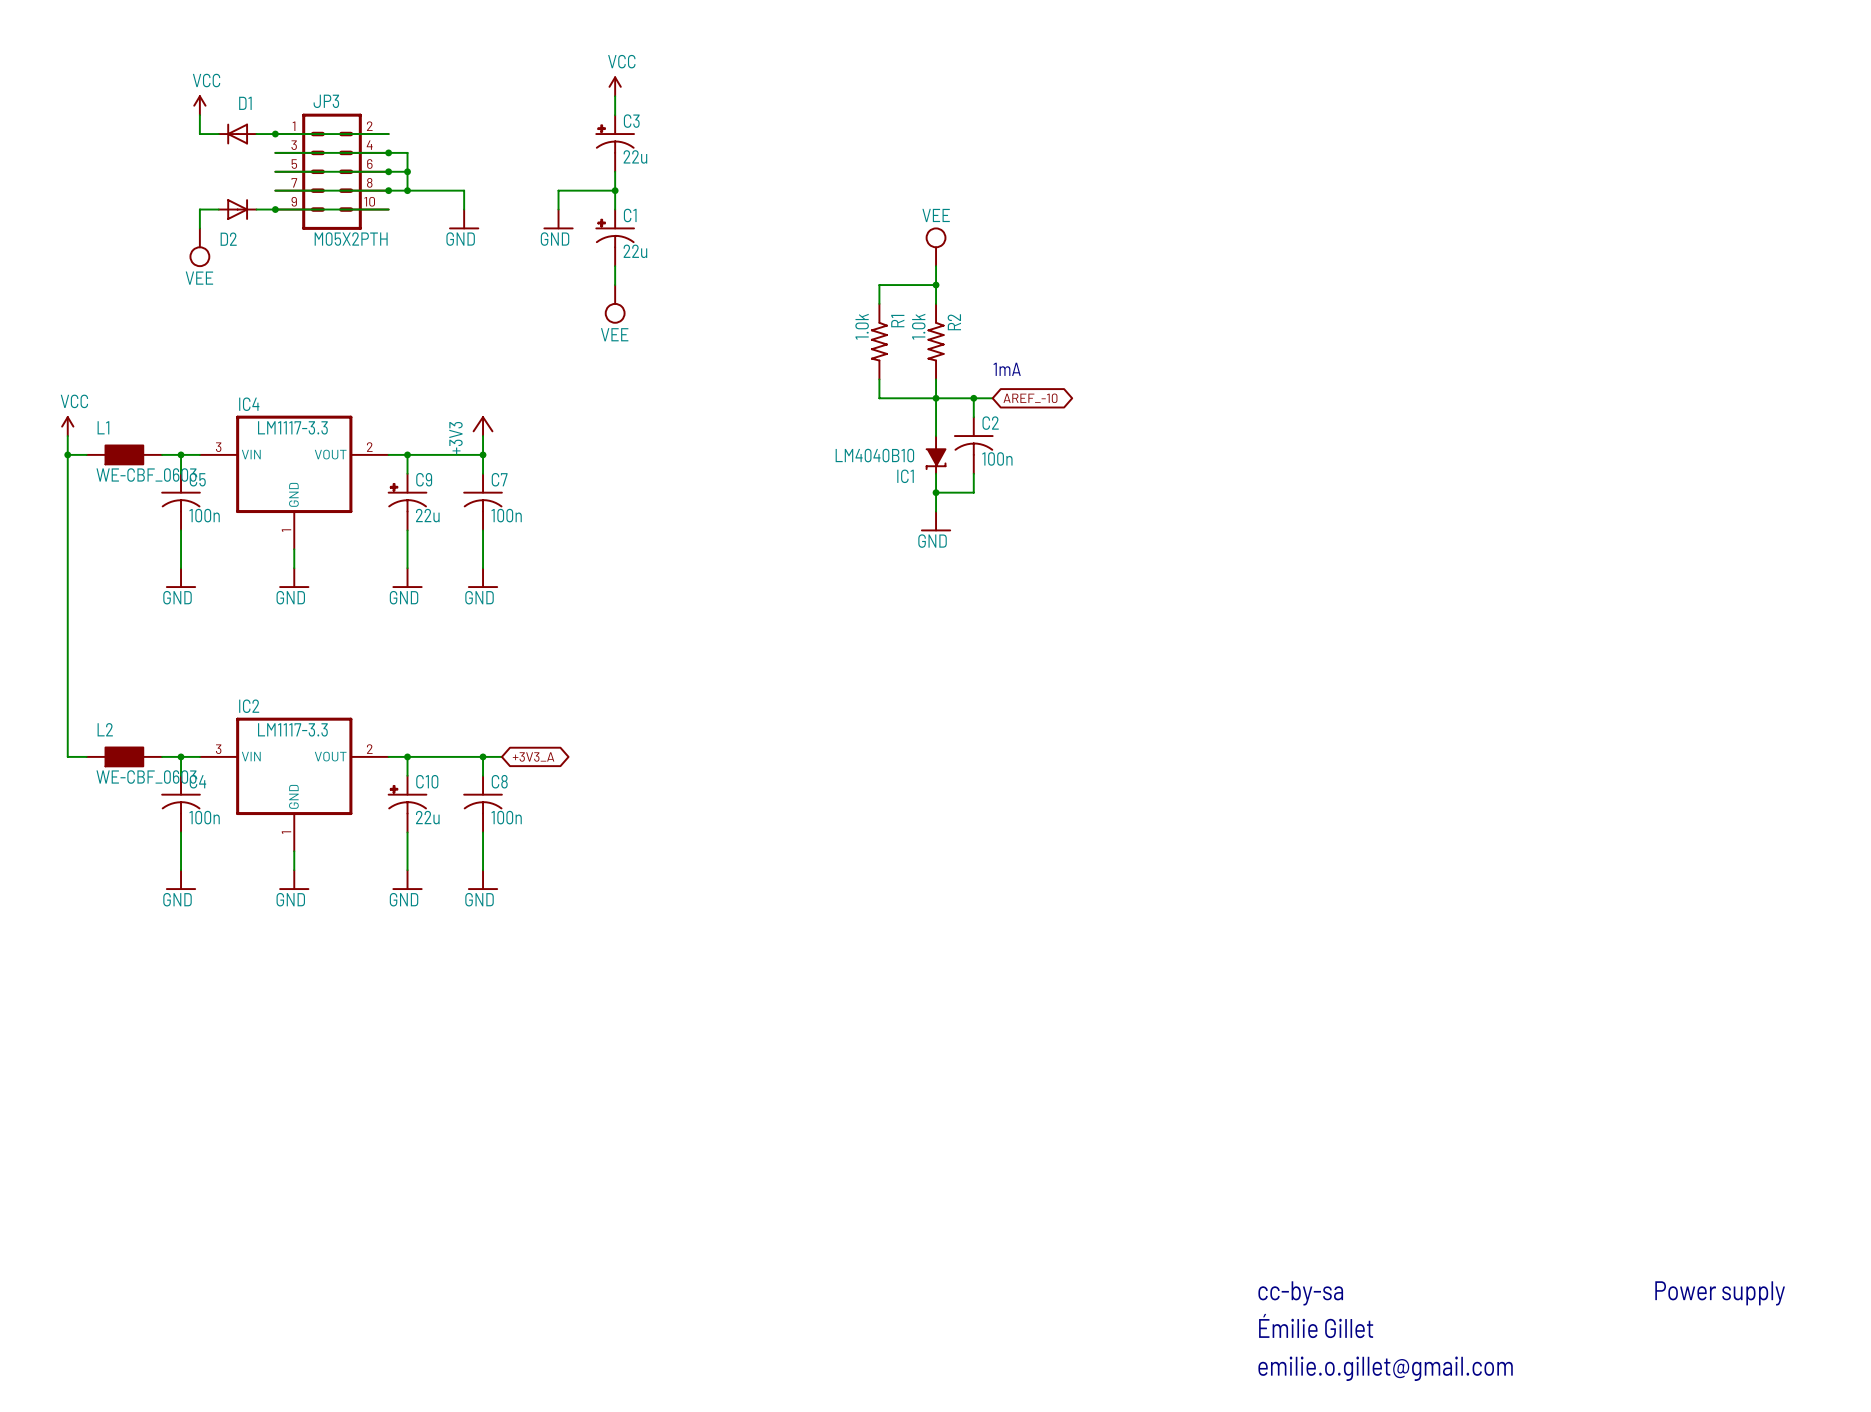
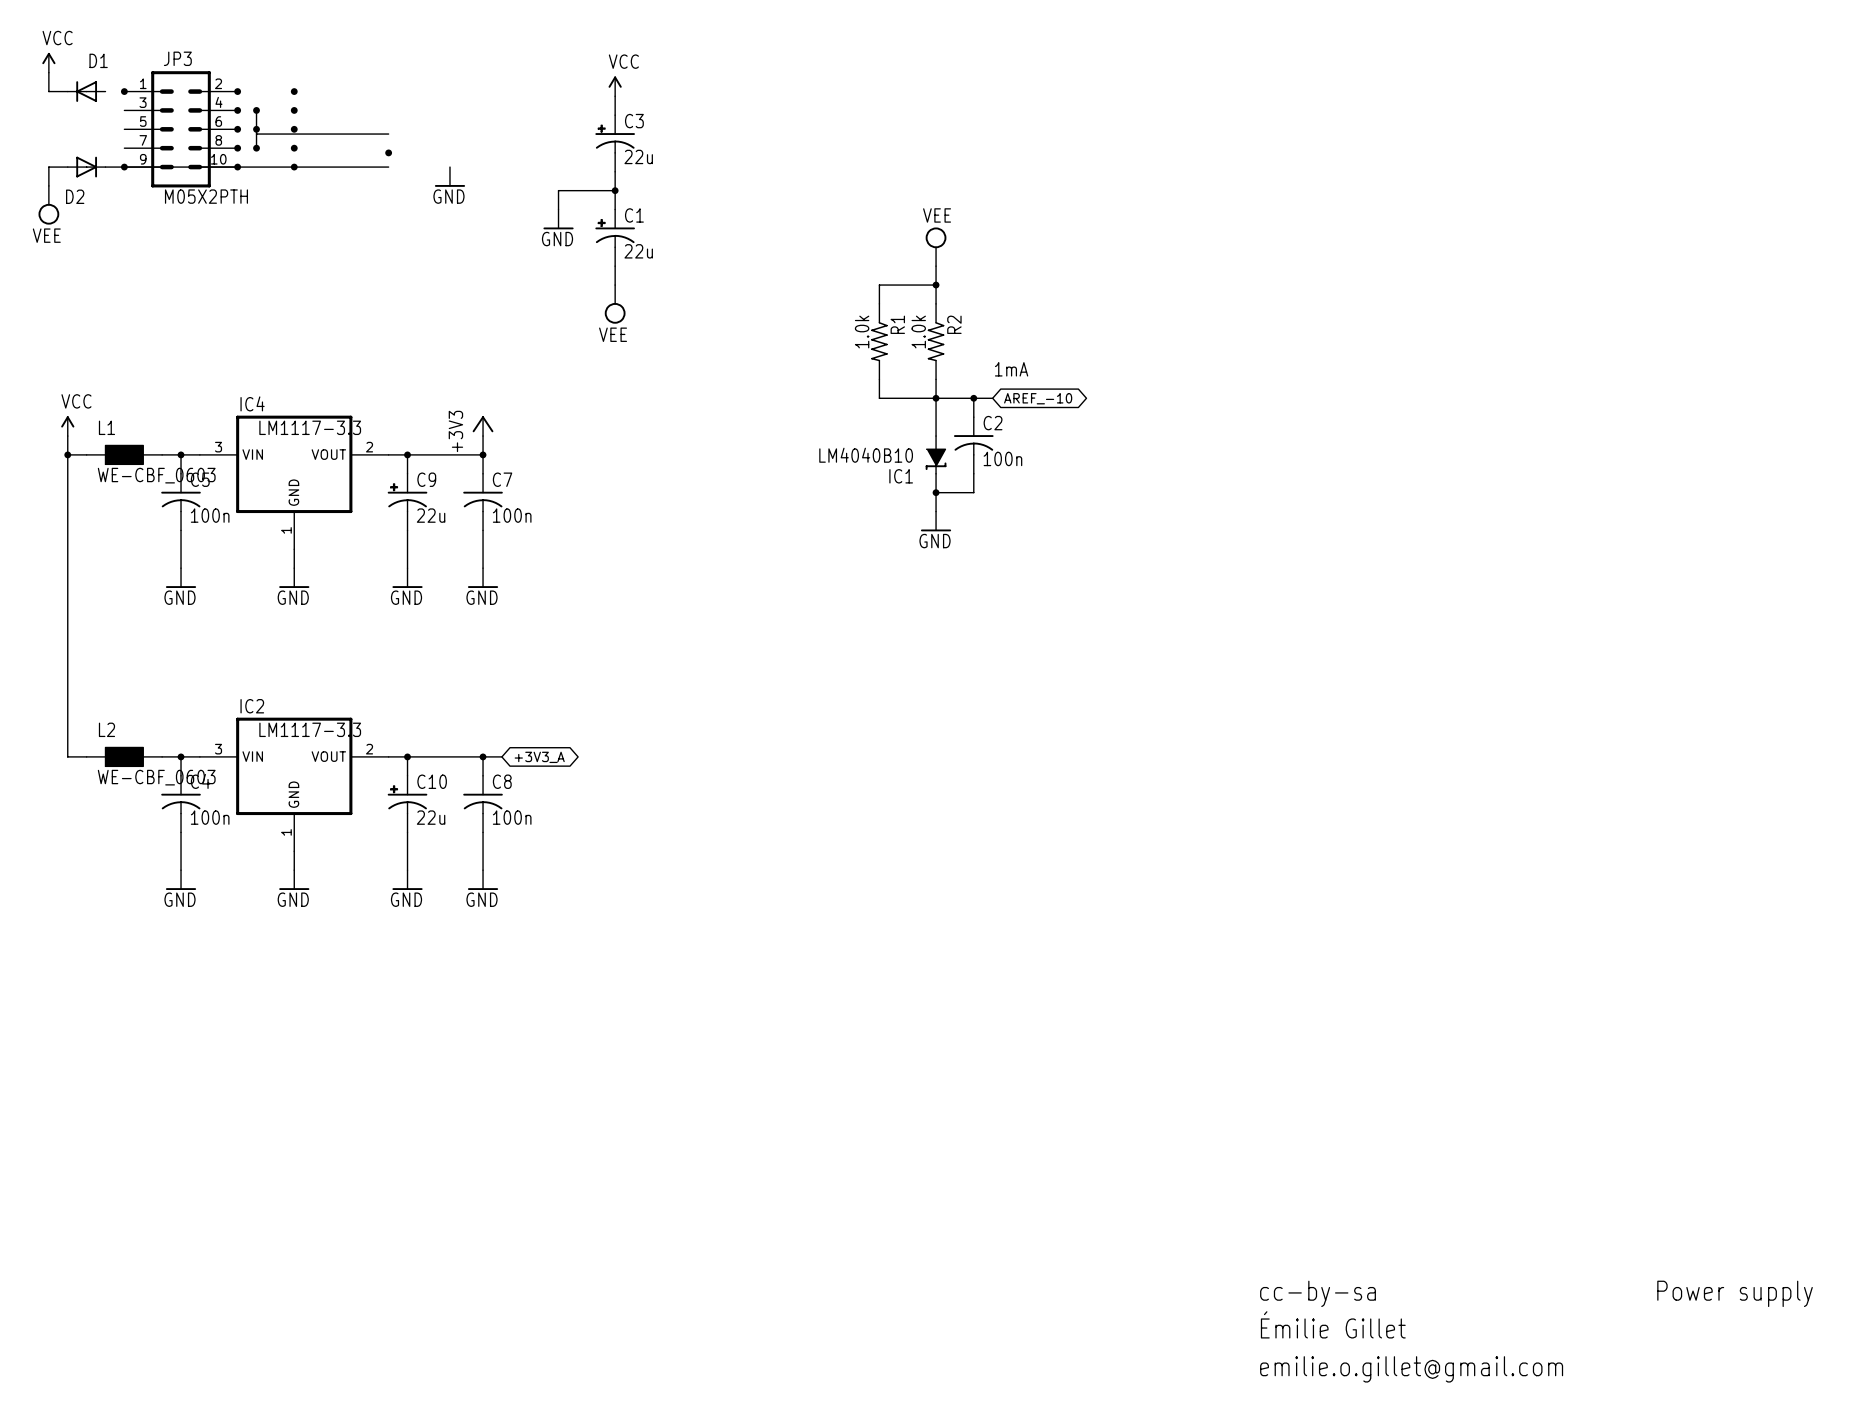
junction: none -> (124, 91)
junction: none -> (237, 91)
junction: none -> (294, 91)
power symbol position: VCC (199, 105) -> VCC (48, 62)
junction: none -> (237, 110)
wire: none -> (256, 110) (256, 148)
junction: none -> (256, 110)
junction: none -> (294, 110)
wire: (199, 115) (199, 134) (218, 134) -> (48, 72) (48, 91) (67, 91)
junction: none -> (237, 129)
junction: none -> (256, 129)
junction: none -> (294, 129)
D1 position: (237, 134) -> (86, 91)
junction: (275, 134) -> none
junction: none -> (237, 148)
junction: none -> (256, 148)
junction: none -> (294, 148)
wire: (275, 152) (407, 152) (407, 190) -> none
wire: none -> (105, 167) (388, 167)
junction: none -> (124, 167)
junction: none -> (237, 167)
junction: none -> (294, 167)
wire: (275, 171) (407, 171) -> none
JP3 position: (332, 171) -> (181, 129)
junction: (388, 171) -> none
junction: (407, 171) -> none
wire: (275, 190) (464, 190) (464, 209) -> none
junction: (388, 190) -> none
junction: (407, 190) -> none
wire: (218, 209) (199, 209) (199, 228) -> (67, 167) (48, 167) (48, 185)
D2 position: (237, 209) -> (86, 167)
wire: (256, 209) (388, 209) -> none
junction: (275, 209) -> none
power symbol position: GND (464, 219) -> GND (449, 176)
power symbol position: VEE (199, 247) -> VEE (48, 205)

